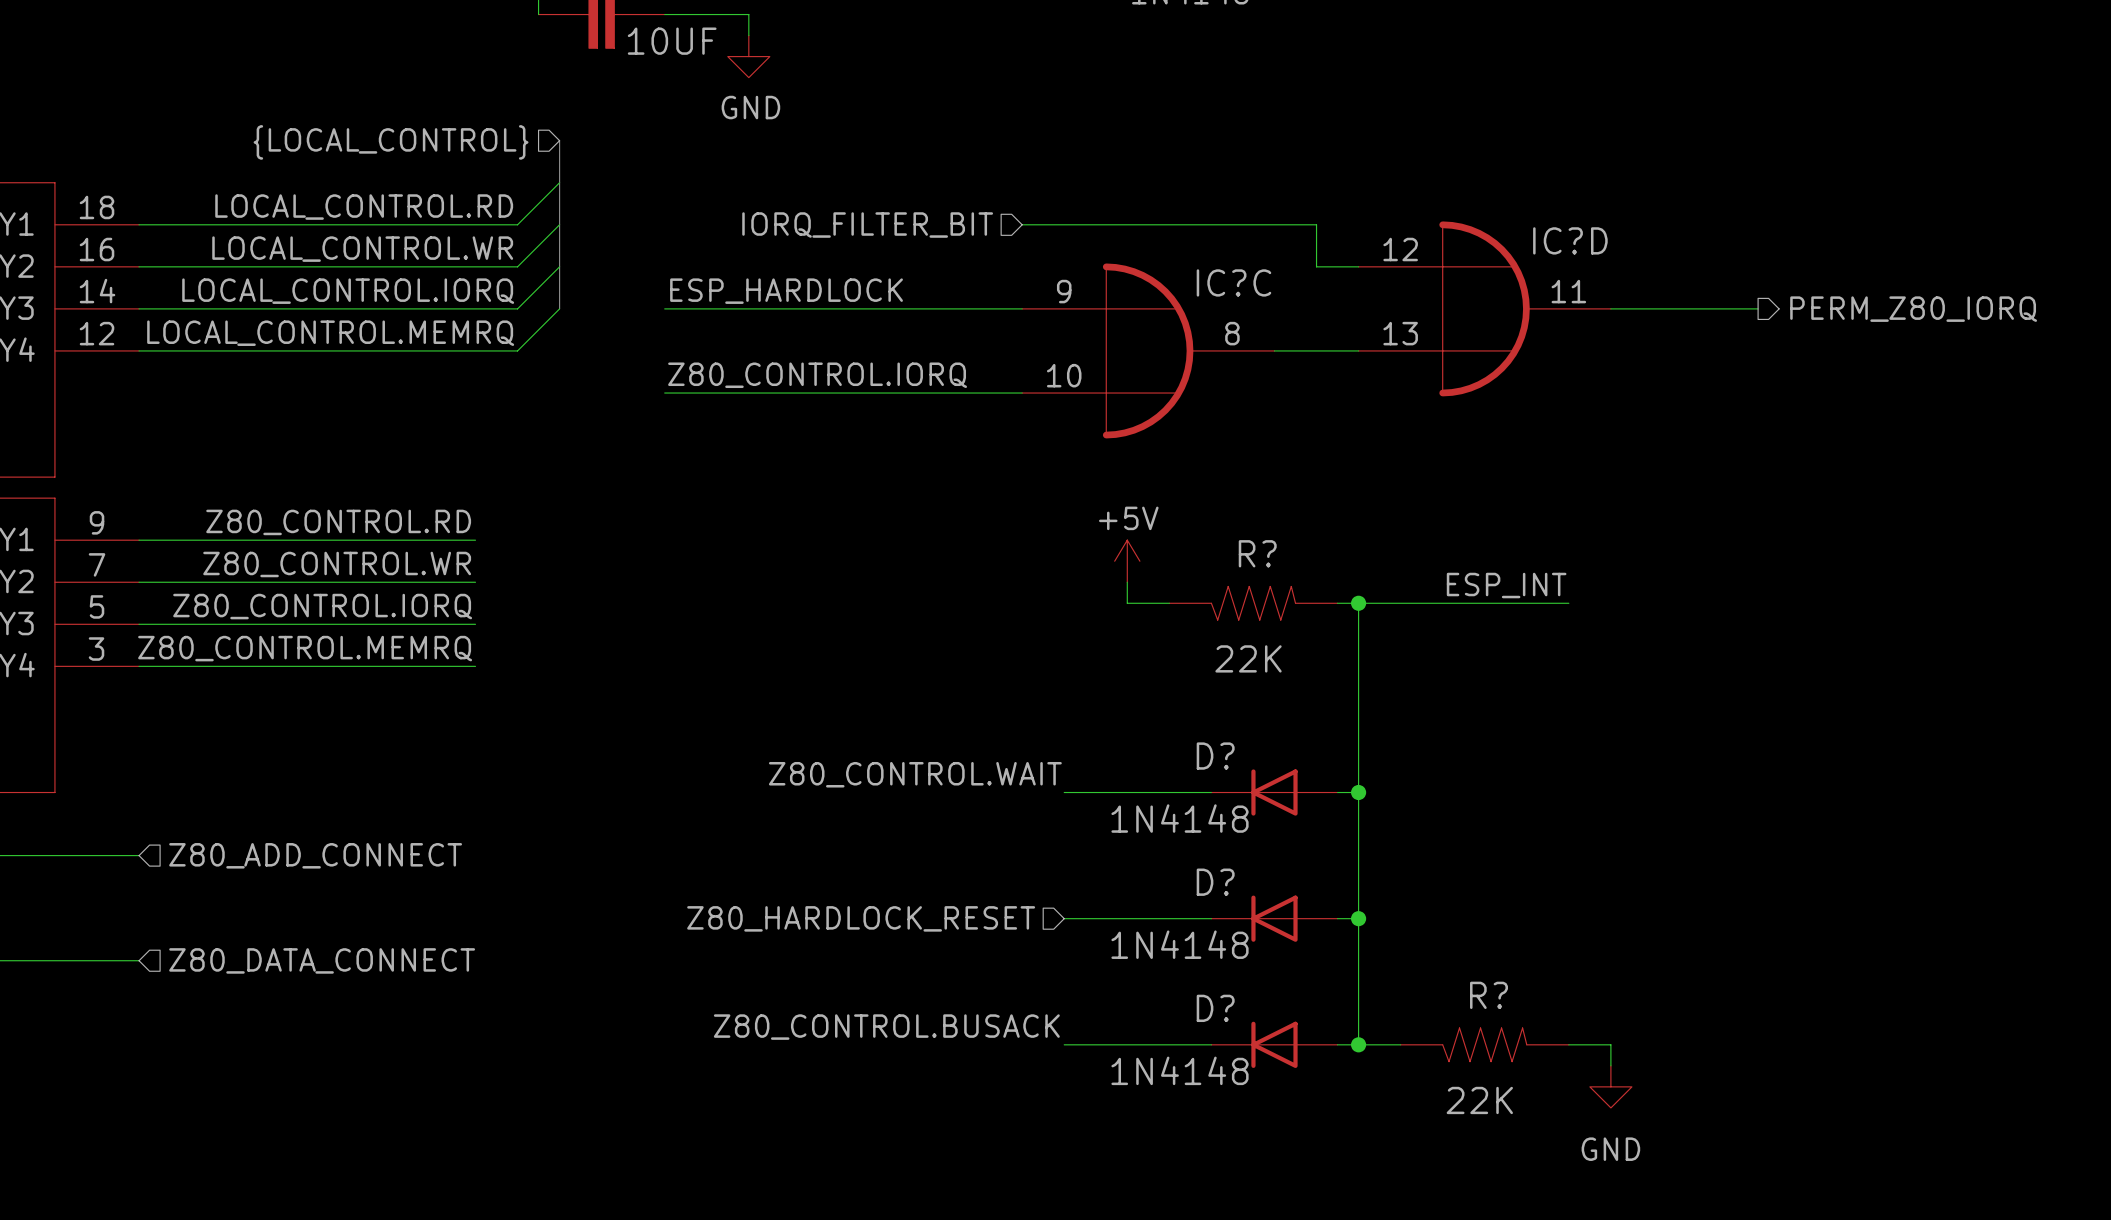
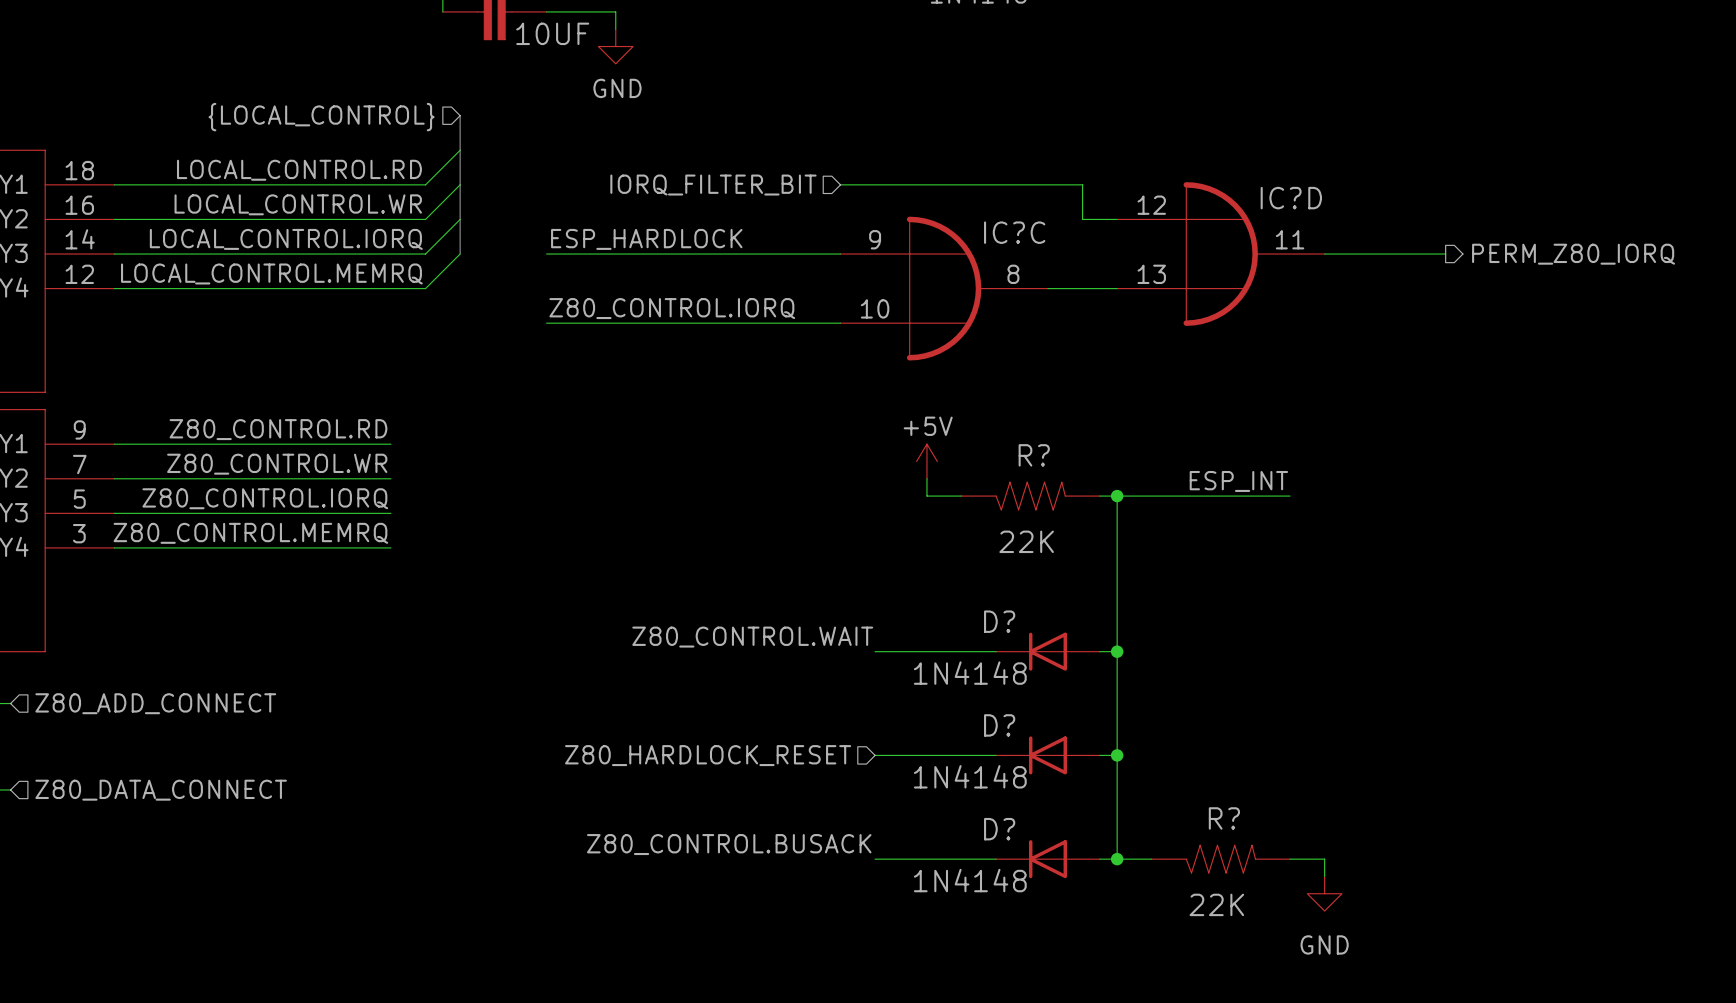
wire: (12, 855) (139, 855) -> none
hierarchical label position: Z80_ADD_CONNECT (315, 855) -> Z80_ADD_CONNECT (155, 703)
wire: (12, 960) (139, 960) -> none
hierarchical label position: Z80_DATA_CONNECT (322, 960) -> Z80_DATA_CONNECT (161, 790)

